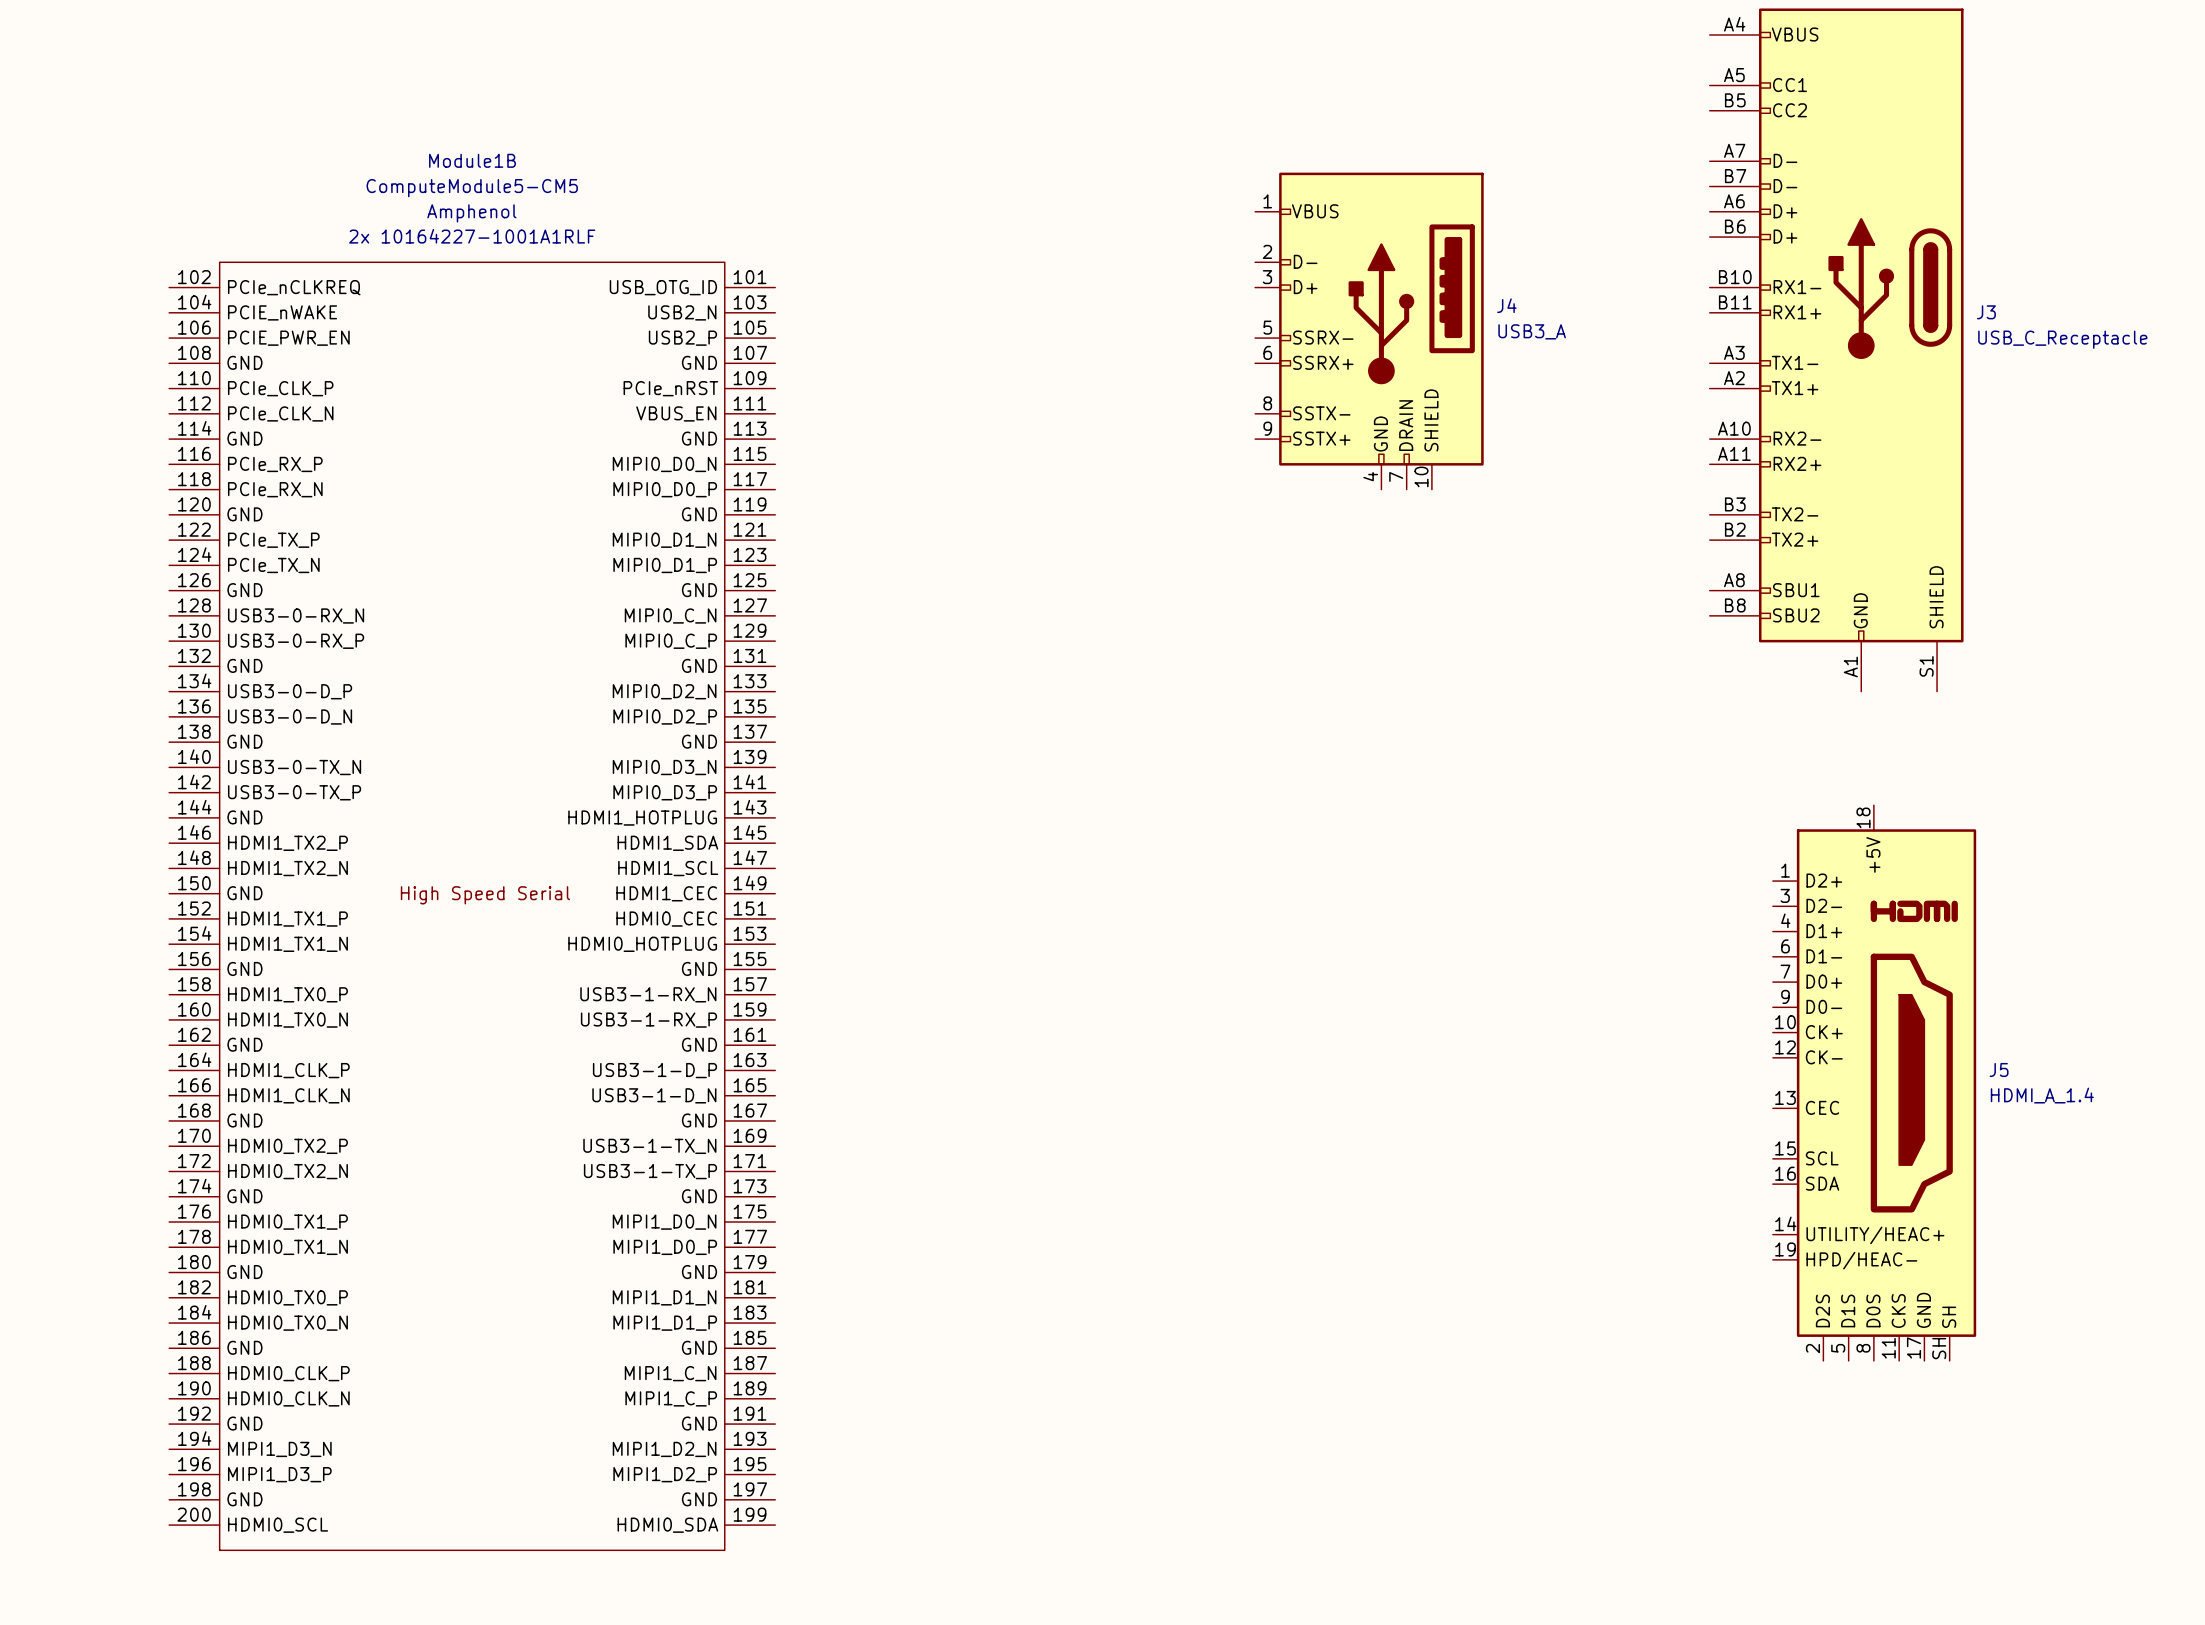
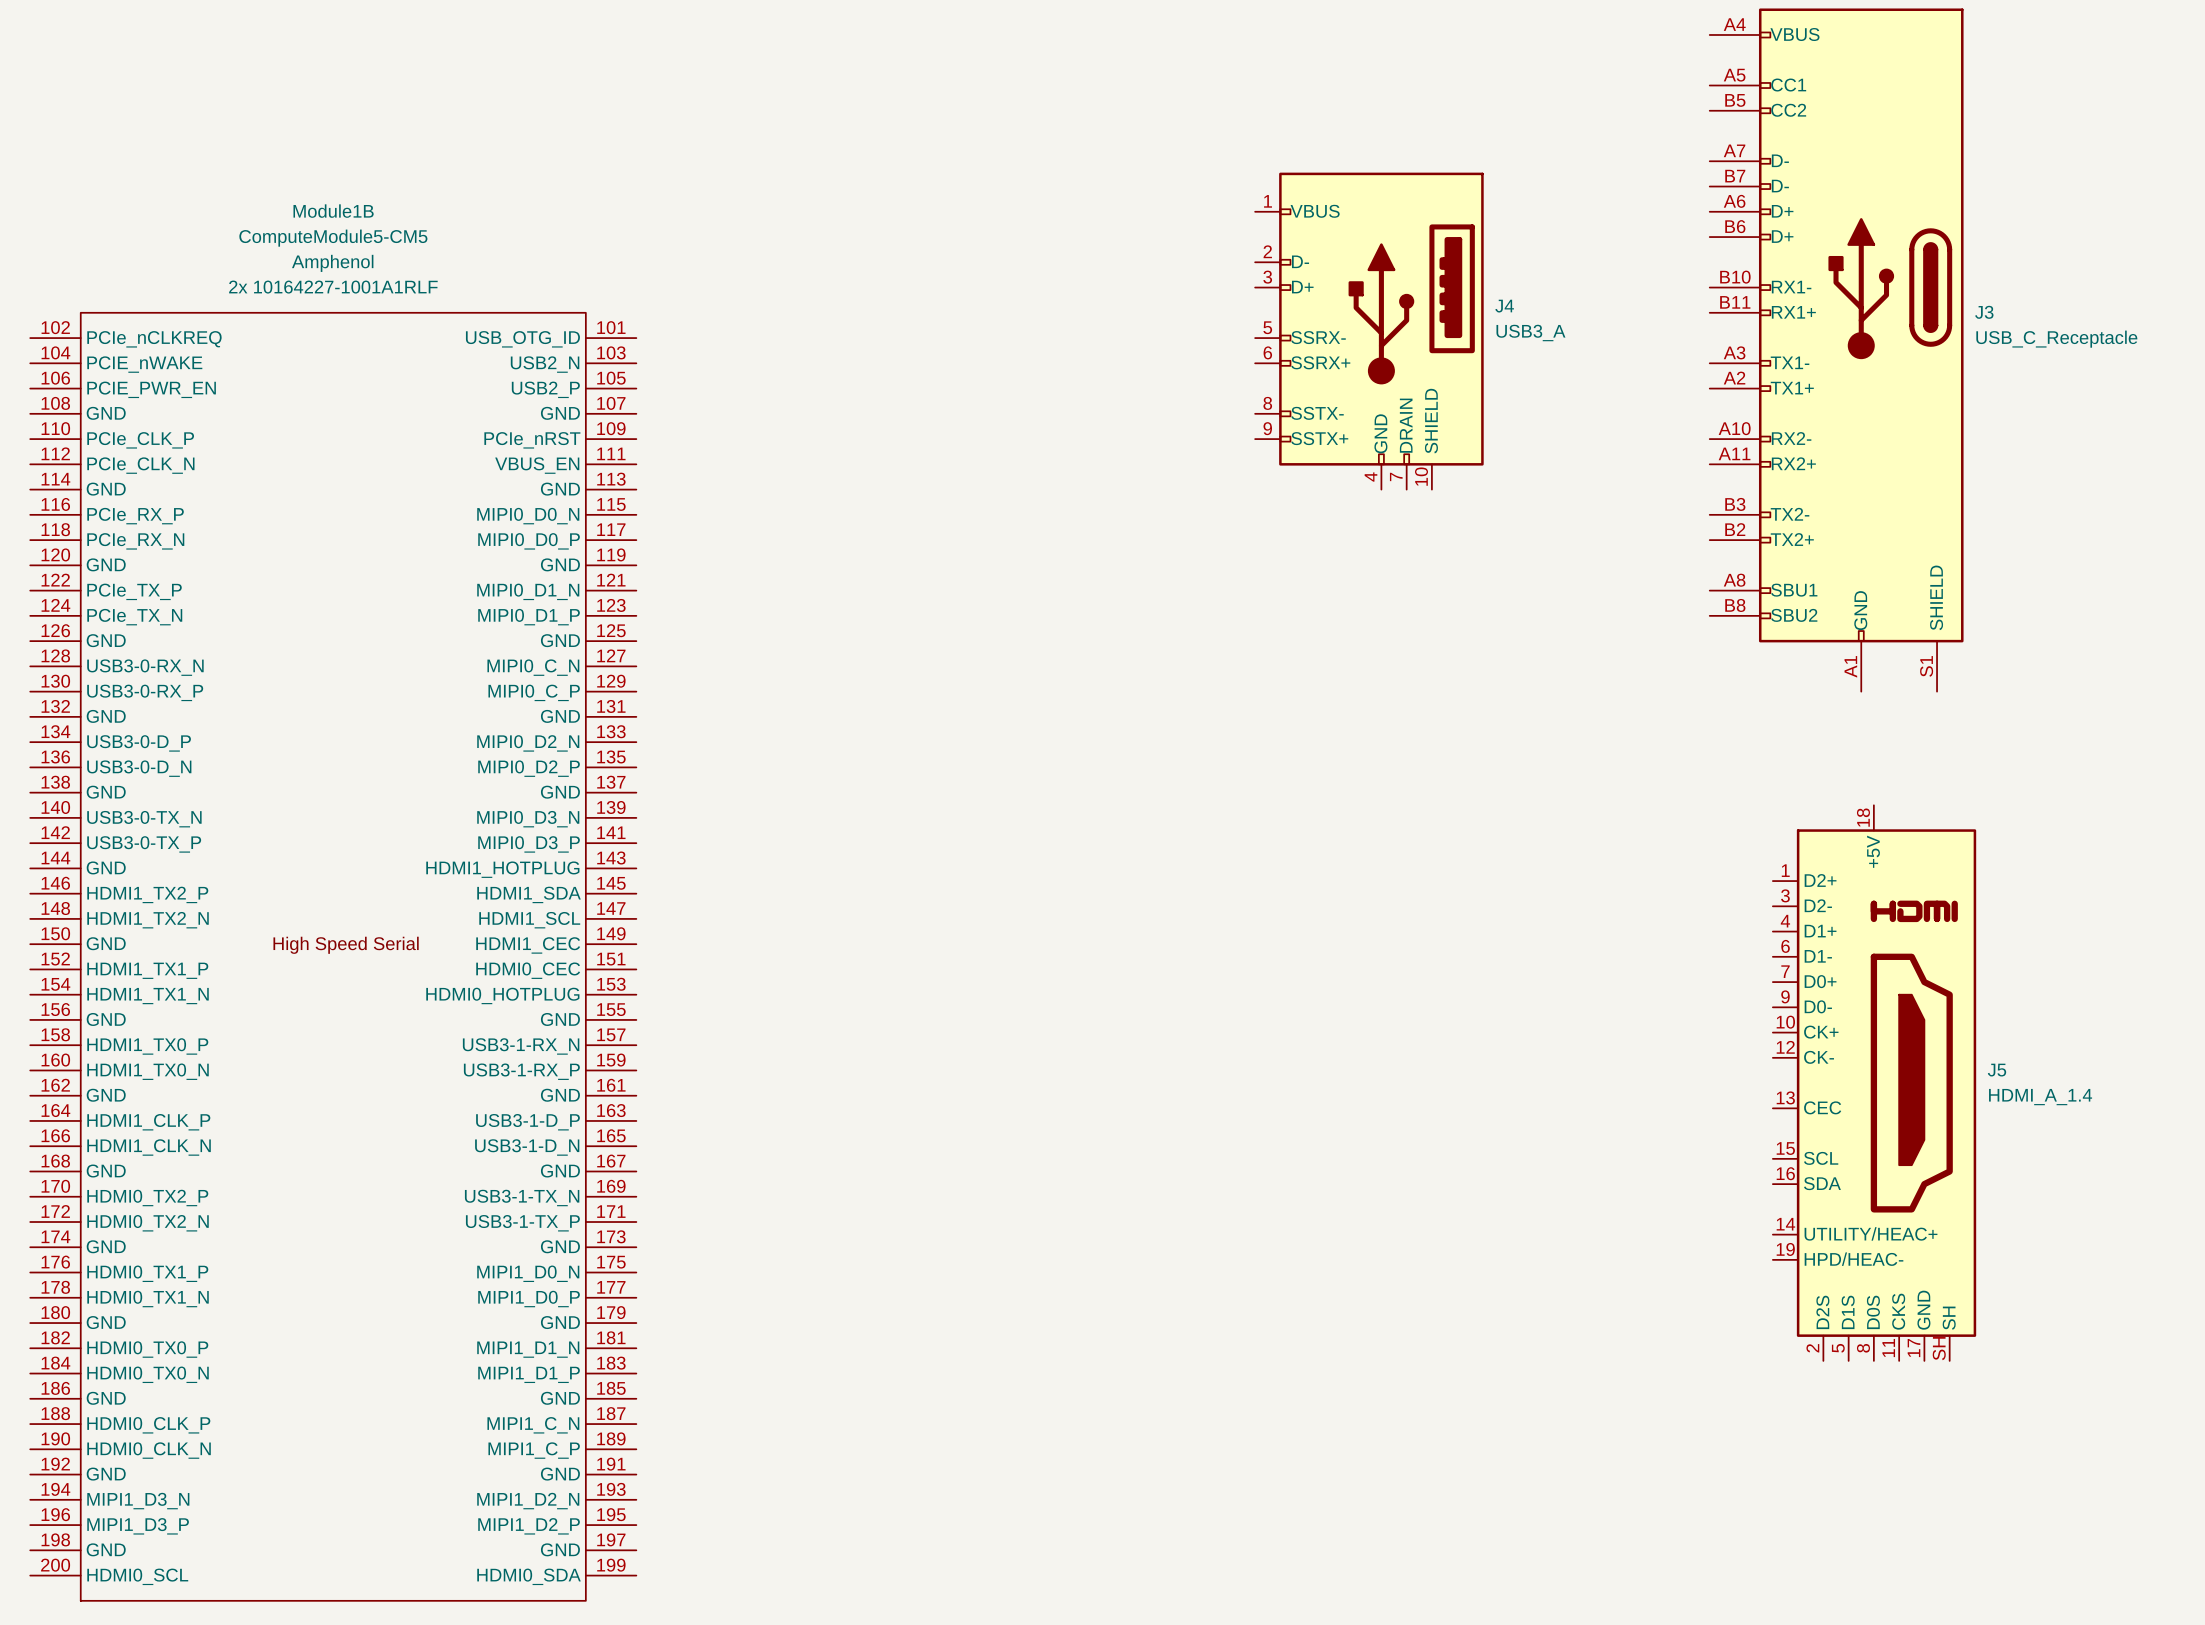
Module1B position: (472, 906) -> (333, 956)

